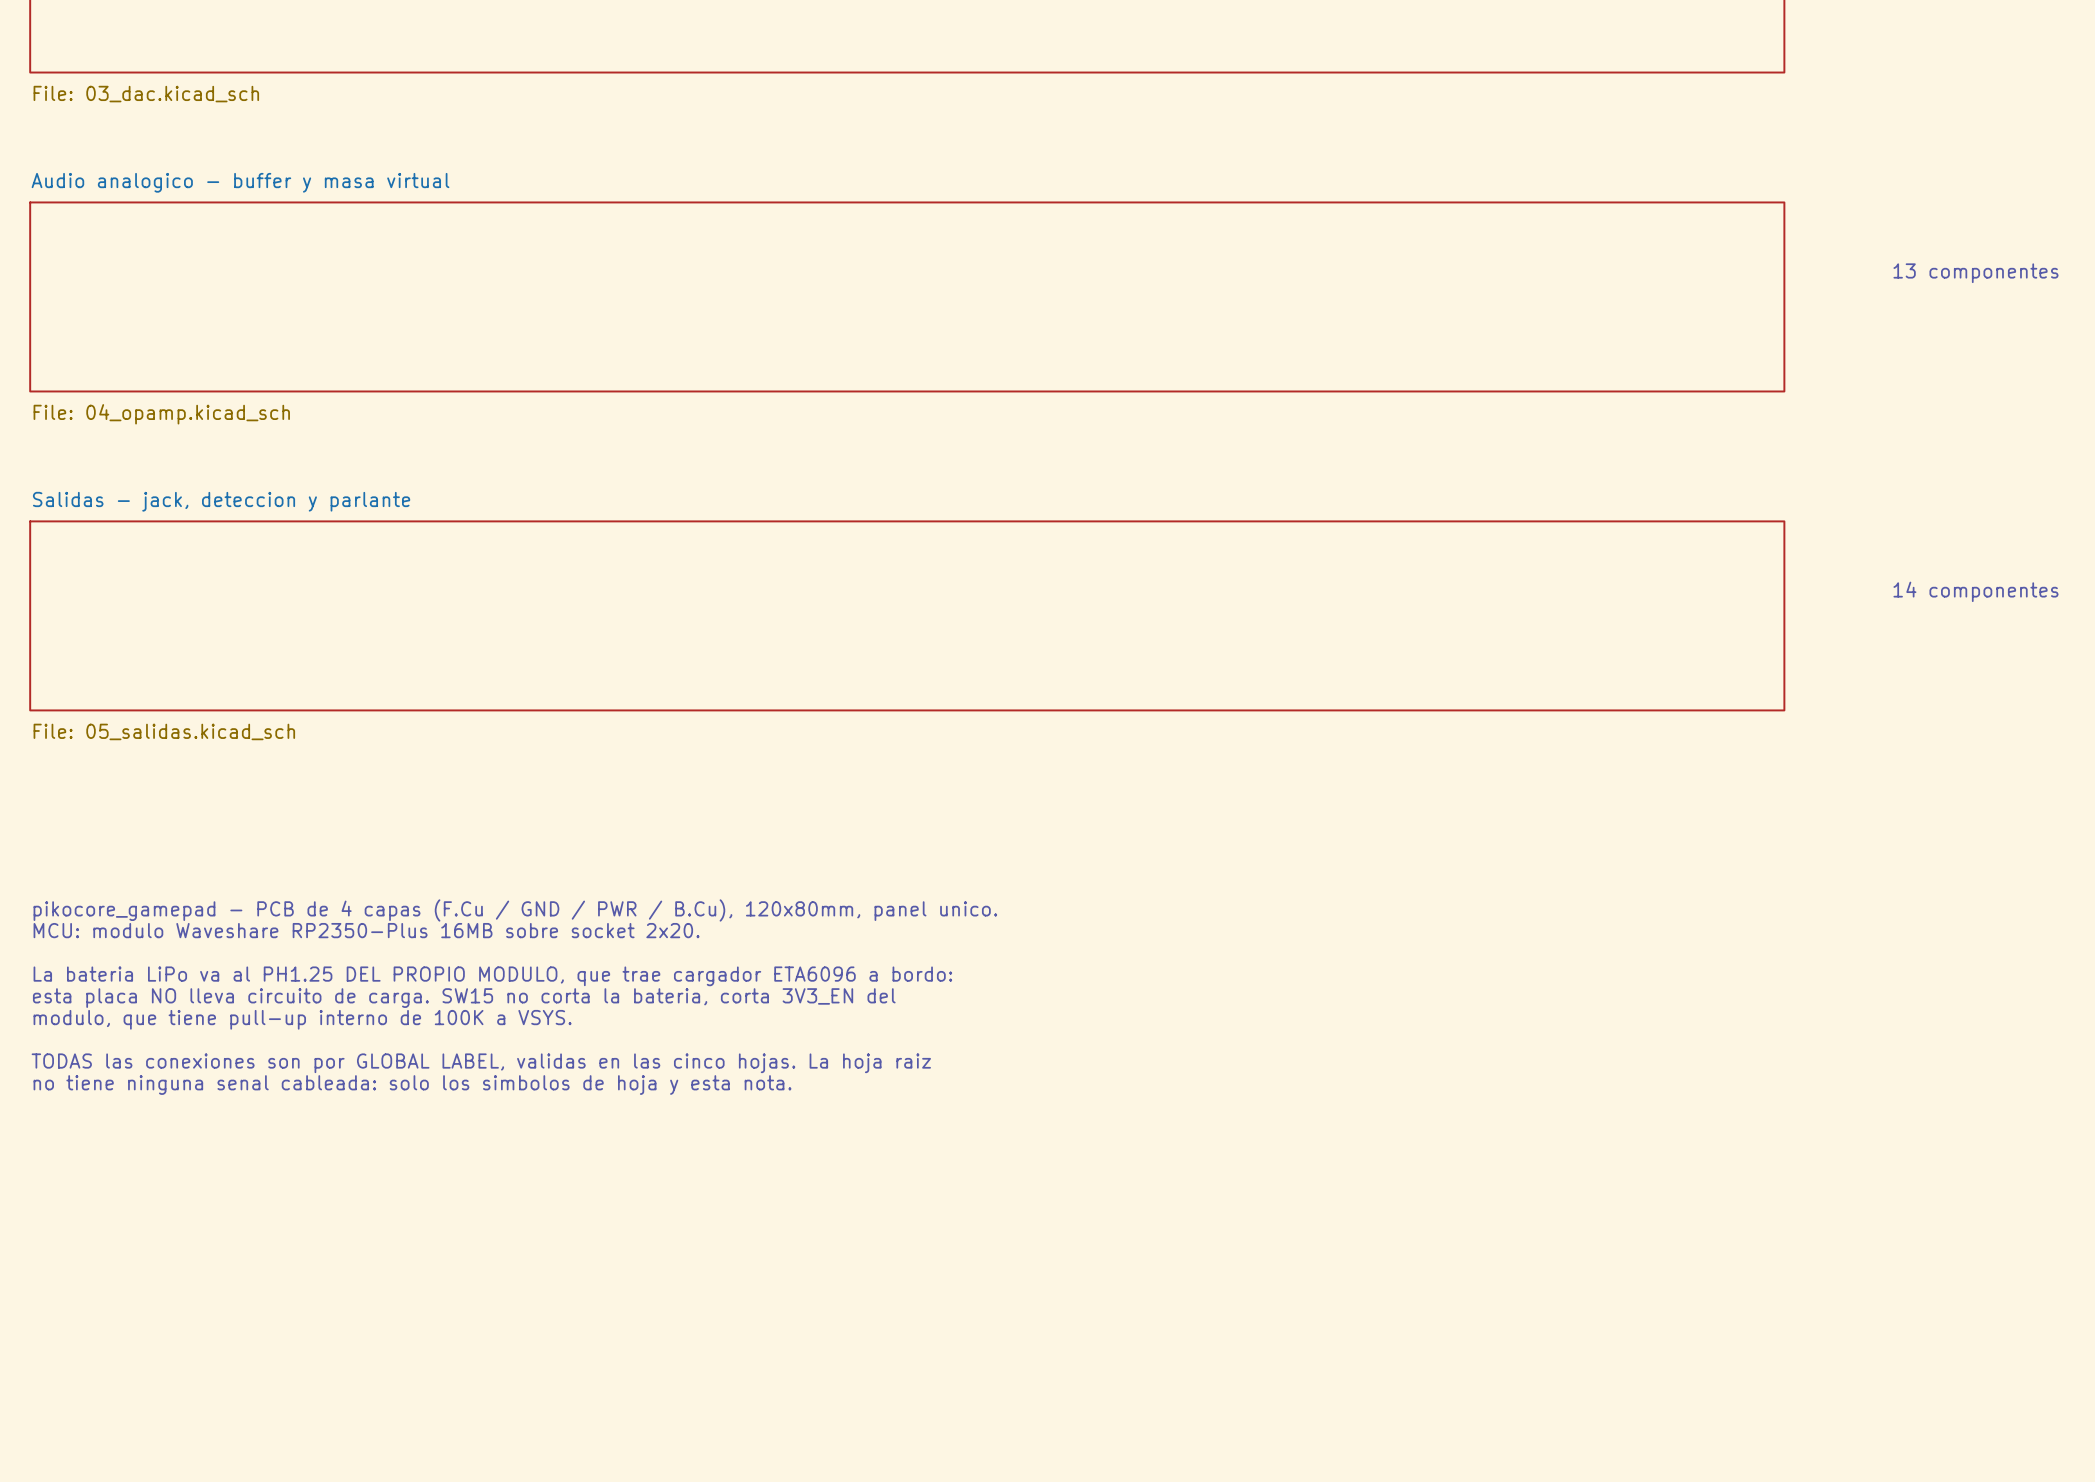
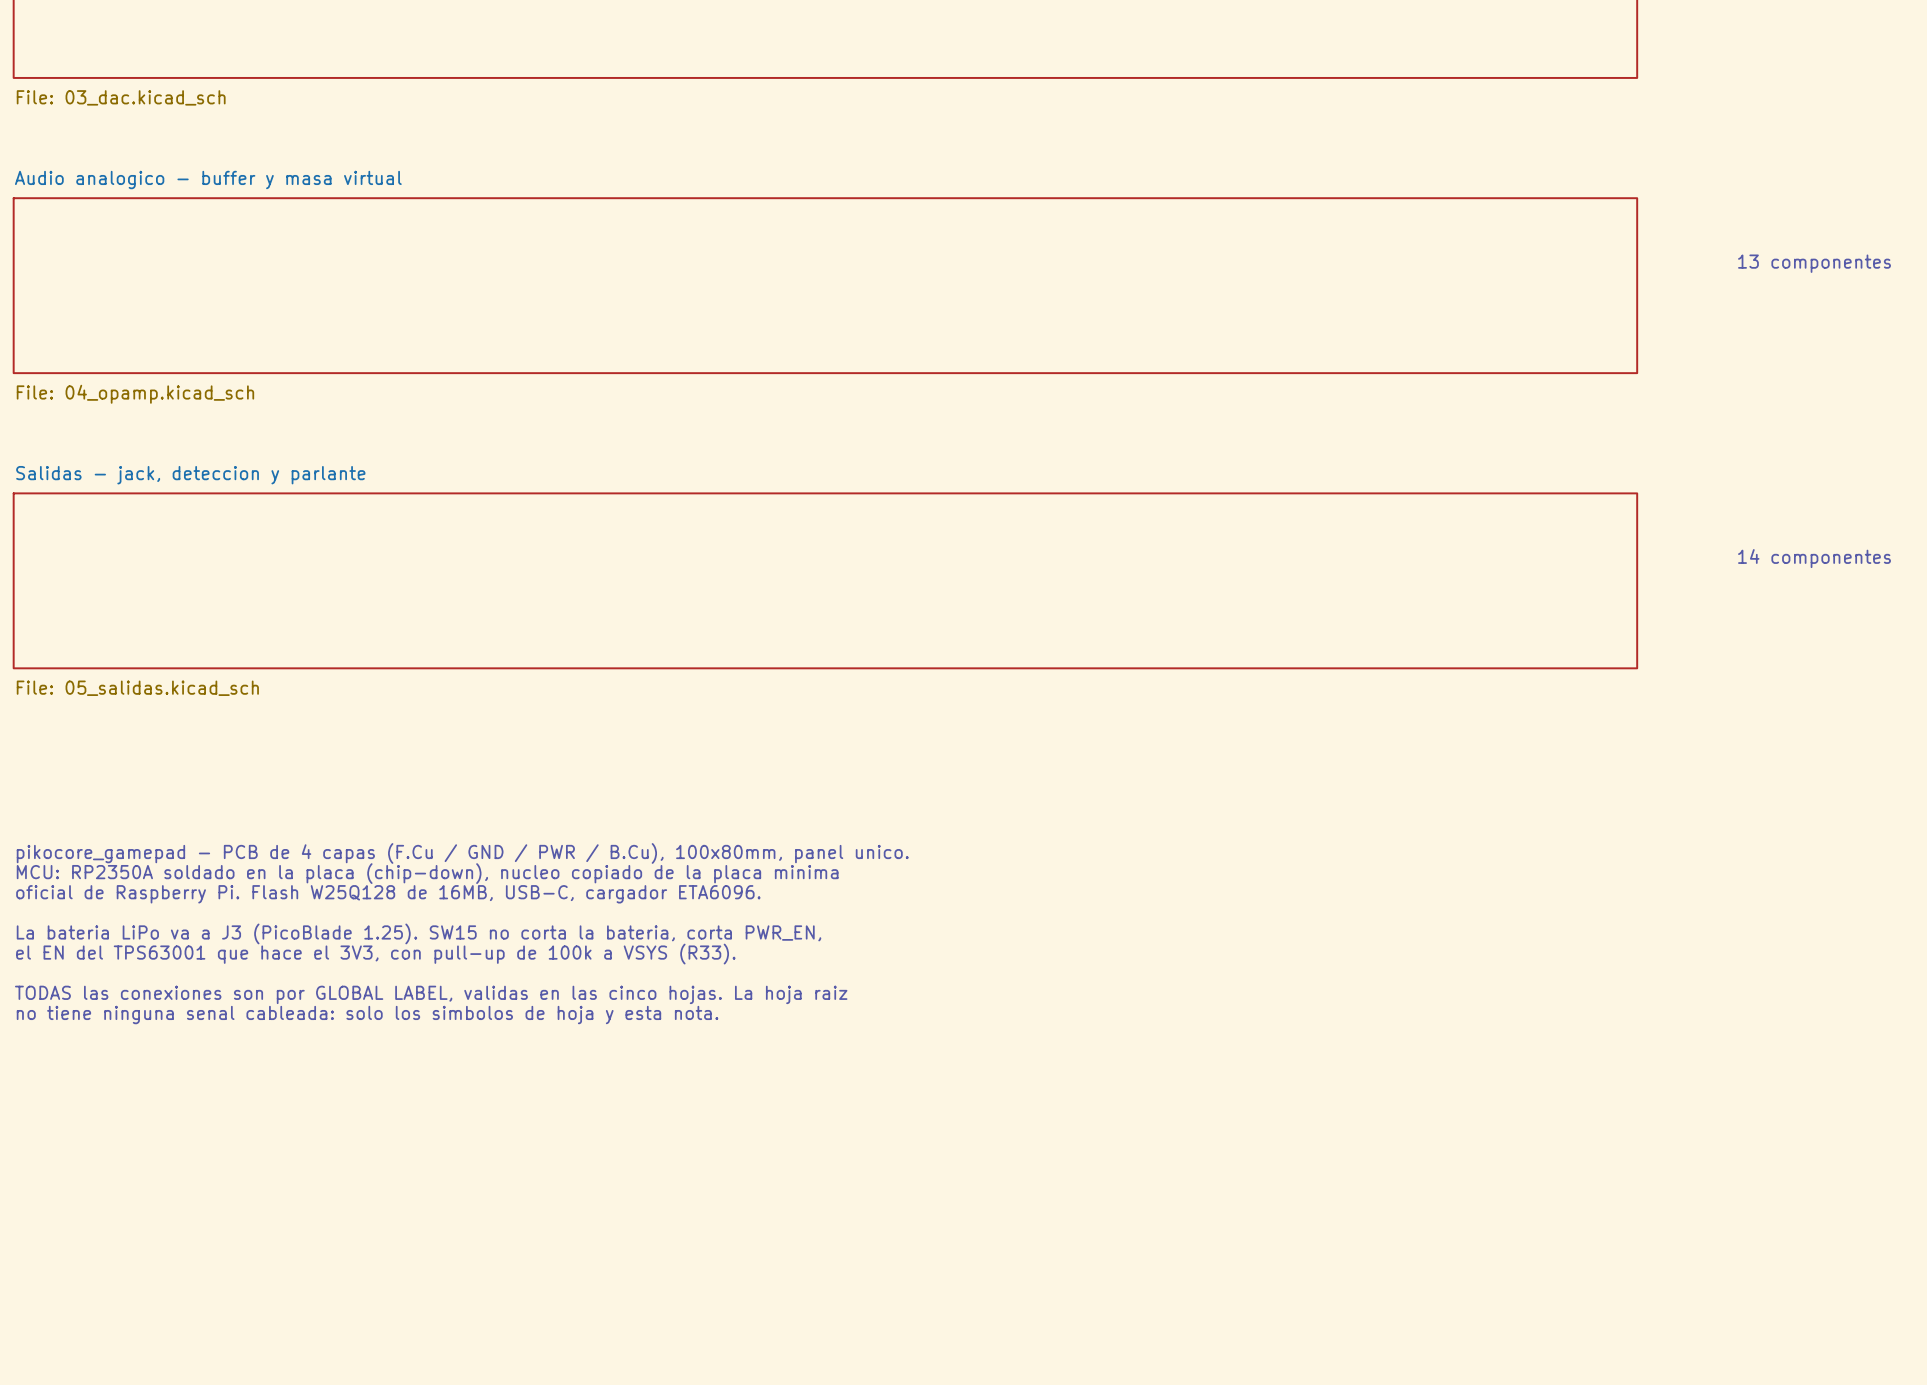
text: pikocore_gamepad - PCB de 4 capas (F.Cu / GND / PWR / B.Cu), 120x80mm, panel unico. (515, 910) -> pikocore_gamepad - PCB de 4 capas (F.Cu / GND / PWR / B.Cu), 100x80mm, panel unico. (462, 853)
text: MCU: modulo Waveshare RP2350-Plus 16MB sobre socket 2x20. (366, 930) -> MCU: RP2350A soldado en la placa (chip-down), nucleo copiado de la placa minima (427, 873)
text: none -> oficial de Raspberry Pi. Flash W25Q128 de 16MB, USB-C, cargador ETA6096. (388, 894)
text: La bateria LiPo va al PH1.25 DEL PROPIO MODULO, que trae cargador ETA6096 a bordo: (492, 976) -> none
text: esta placa NO lleva circuito de carga. SW15 no corta la bateria, corta 3V3_EN del (464, 998) -> La bateria LiPo va a J3 (PicoBlade 1.25). SW15 no corta la bateria, corta PWR_EN, (419, 933)
text: modulo, que tiene pull-up interno de 100K a VSYS. (302, 1019) -> el EN del TPS63001 que hace el 3V3, con pull-up de 100k a VSYS (R33). (375, 954)

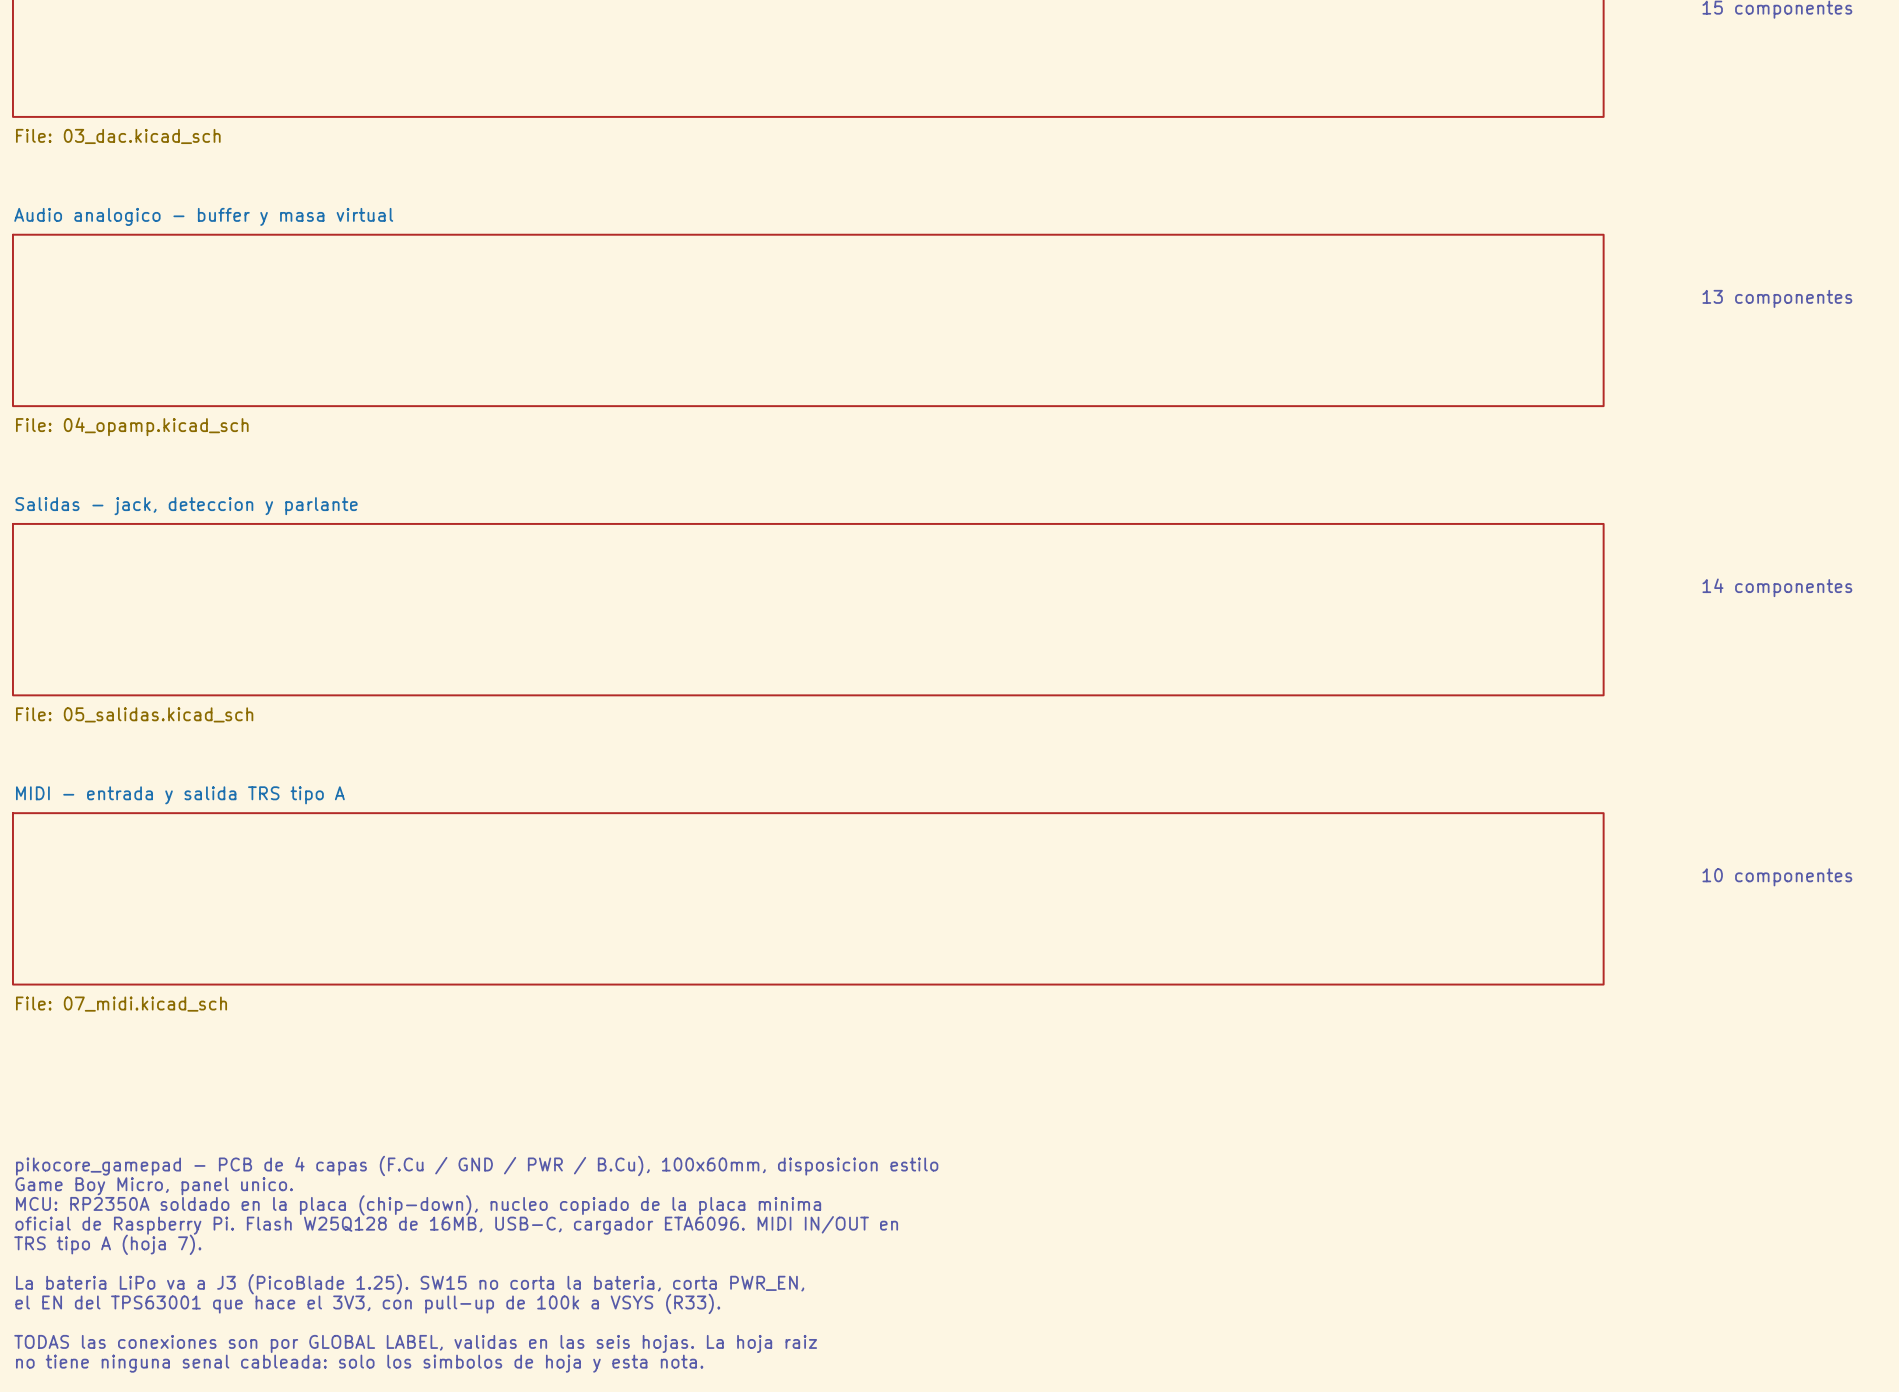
text: pikocore_gamepad - PCB de 4 capas (F.Cu / GND / PWR / B.Cu), 100x80mm, panel unico. (462, 853) -> none
text: none -> 10 componentes (1777, 877)
text: MCU: RP2350A soldado en la placa (chip-down), nucleo copiado de la placa minima (427, 873) -> none
sheet MIDI - entrada y salida TRS tipo A: none -> File: 07_midi.kicad_sch (808, 898)
text: oficial de Raspberry Pi. Flash W25Q128 de 16MB, USB-C, cargador ETA6096. (388, 894) -> none
text: La bateria LiPo va a J3 (PicoBlade 1.25). SW15 no corta la bateria, corta PWR_EN, (419, 933) -> none
text: el EN del TPS63001 que hace el 3V3, con pull-up de 100k a VSYS (R33). (375, 954) -> none
text: TODAS las conexiones son por GLOBAL LABEL, validas en las cinco hojas. La hoja raiz (431, 994) -> none
text: no tiene ninguna senal cableada: solo los simbolos de hoja y esta nota. (367, 1015) -> none
text: none -> pikocore_gamepad - PCB de 4 capas (F.Cu / GND / PWR / B.Cu), 100x60mm, disposicion estilo (477, 1165)
text: none -> Game Boy Micro, panel unico. (154, 1186)
text: none -> MCU: RP2350A soldado en la placa (chip-down), nucleo copiado de la placa minima (418, 1205)
text: none -> oficial de Raspberry Pi. Flash W25Q128 de 16MB, USB-C, cargador ETA6096. MIDI IN/OUT en (456, 1225)
text: none -> TRS tipo A (hoja 7). (107, 1244)
text: none -> La bateria LiPo va a J3 (PicoBlade 1.25). SW15 no corta la bateria, corta PWR_EN, (410, 1284)
text: none -> el EN del TPS63001 que hace el 3V3, con pull-up de 100k a VSYS (R33). (367, 1303)
text: none -> TODAS las conexiones son por GLOBAL LABEL, validas en las seis hojas. La hoja raiz (415, 1343)
text: none -> no tiene ninguna senal cableada: solo los simbolos de hoja y esta nota. (359, 1363)

